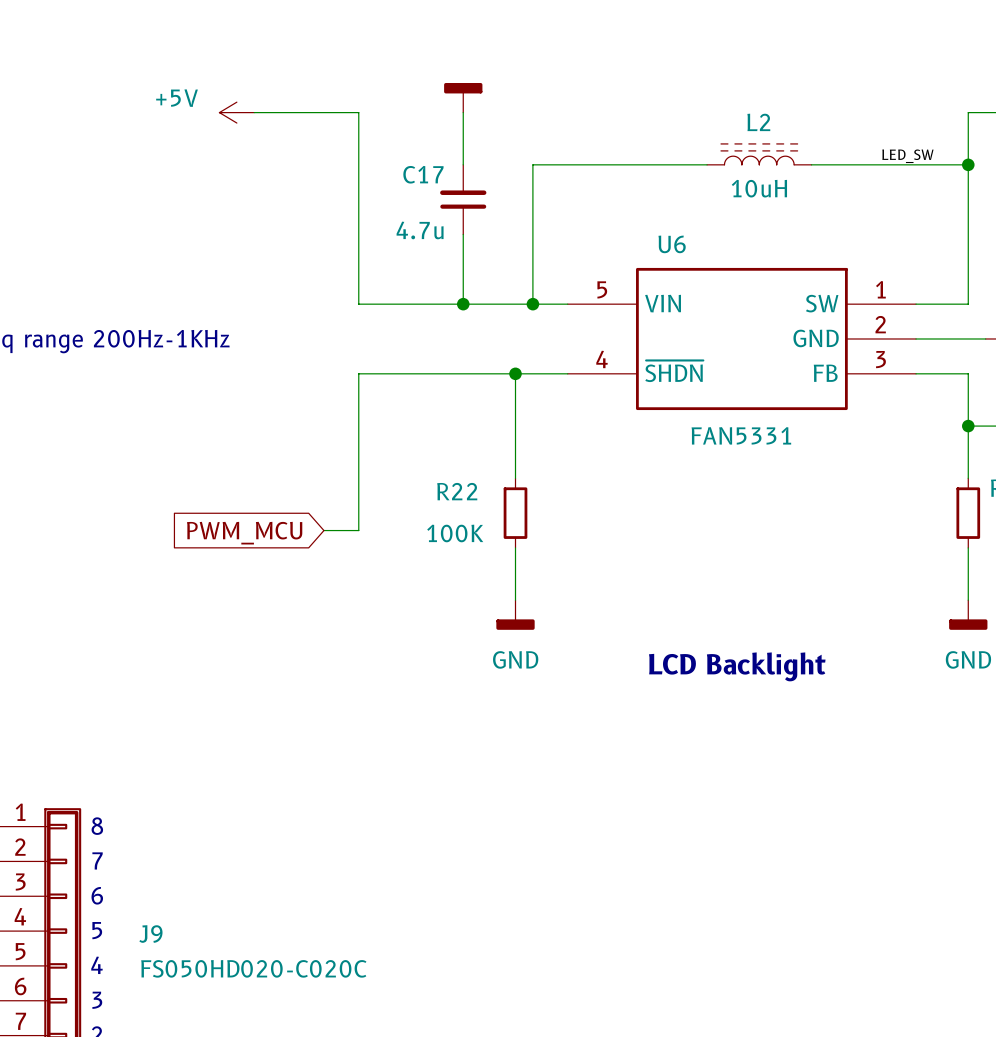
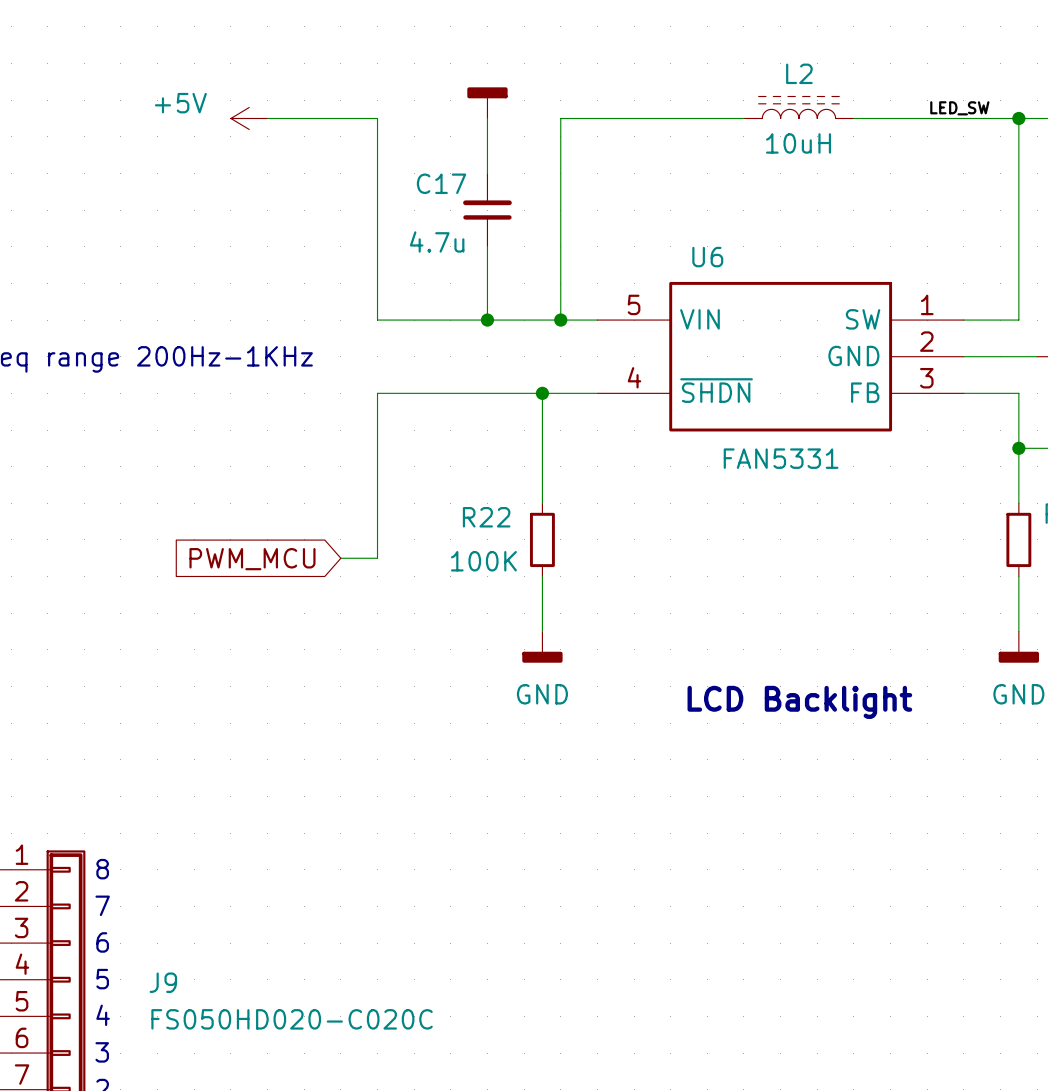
L2 position: (759, 154) -> (798, 107)
label position: LED_SW (907, 156) -> LED_SW (959, 108)
wire: (532, 164) (707, 164) -> (560, 173) (560, 118) (743, 118)
wire: (811, 164) (968, 164) -> (853, 118) (1018, 118)
junction position: (968, 164) -> (1018, 118)

